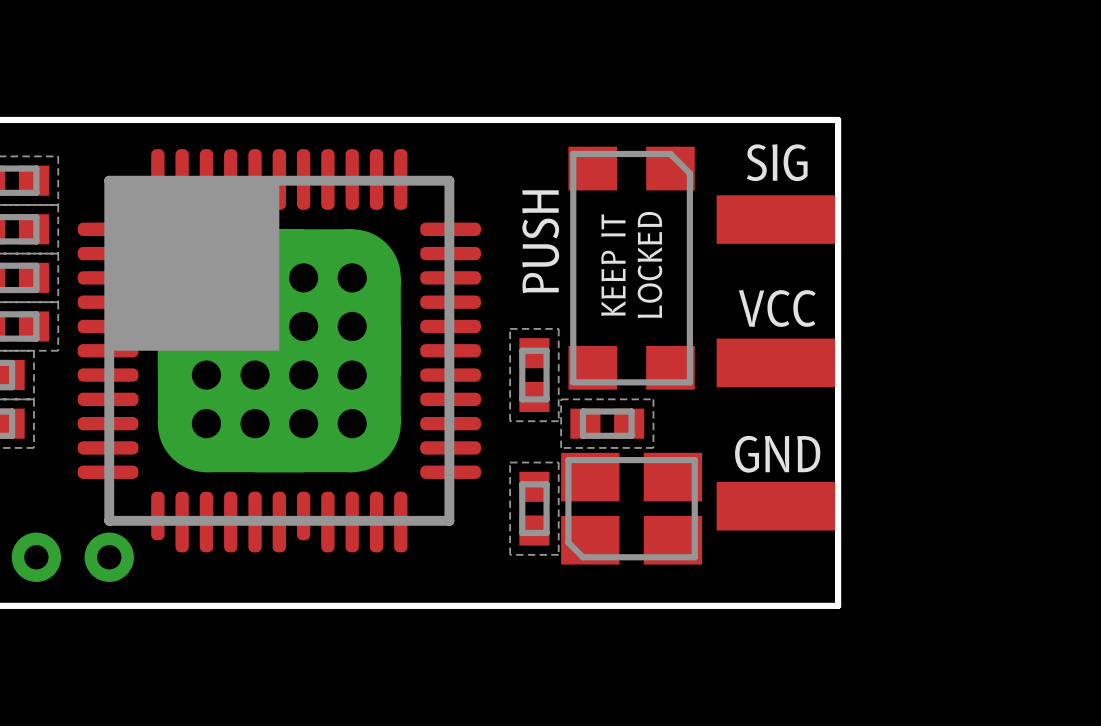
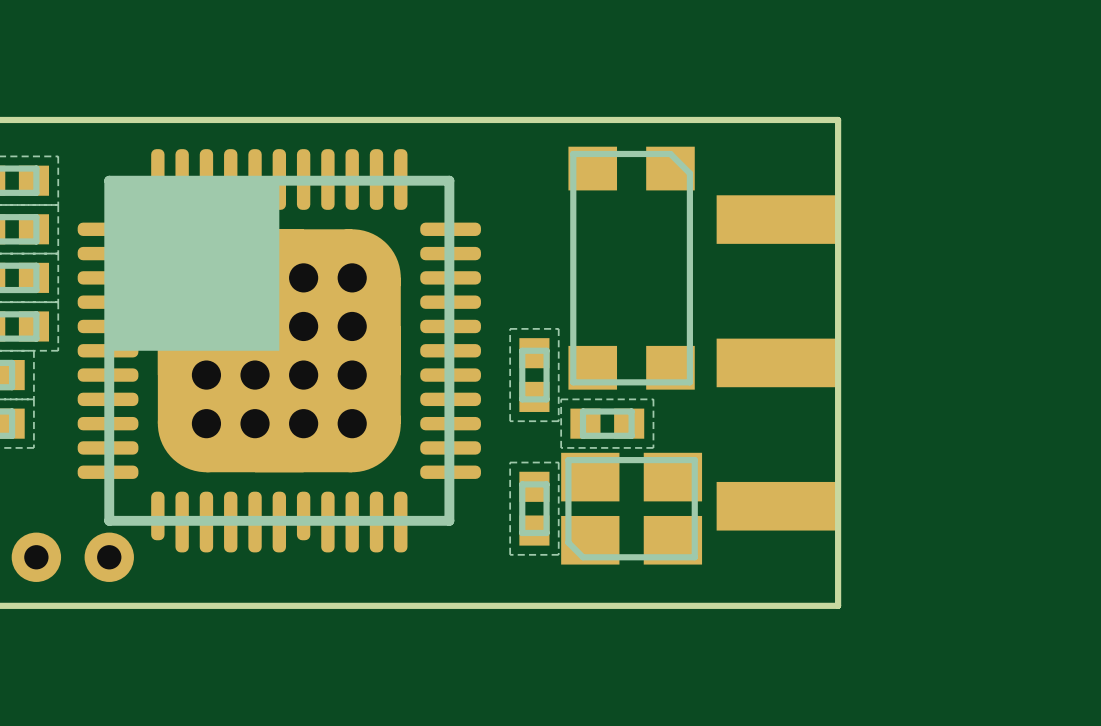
text: SIG (777, 162) -> none
text: PUSH (540, 241) -> none
text: KEEP IT (613, 265) -> none
text: LOCKED (649, 265) -> none
text: VCC (777, 308) -> none
text: GND (777, 454) -> none

